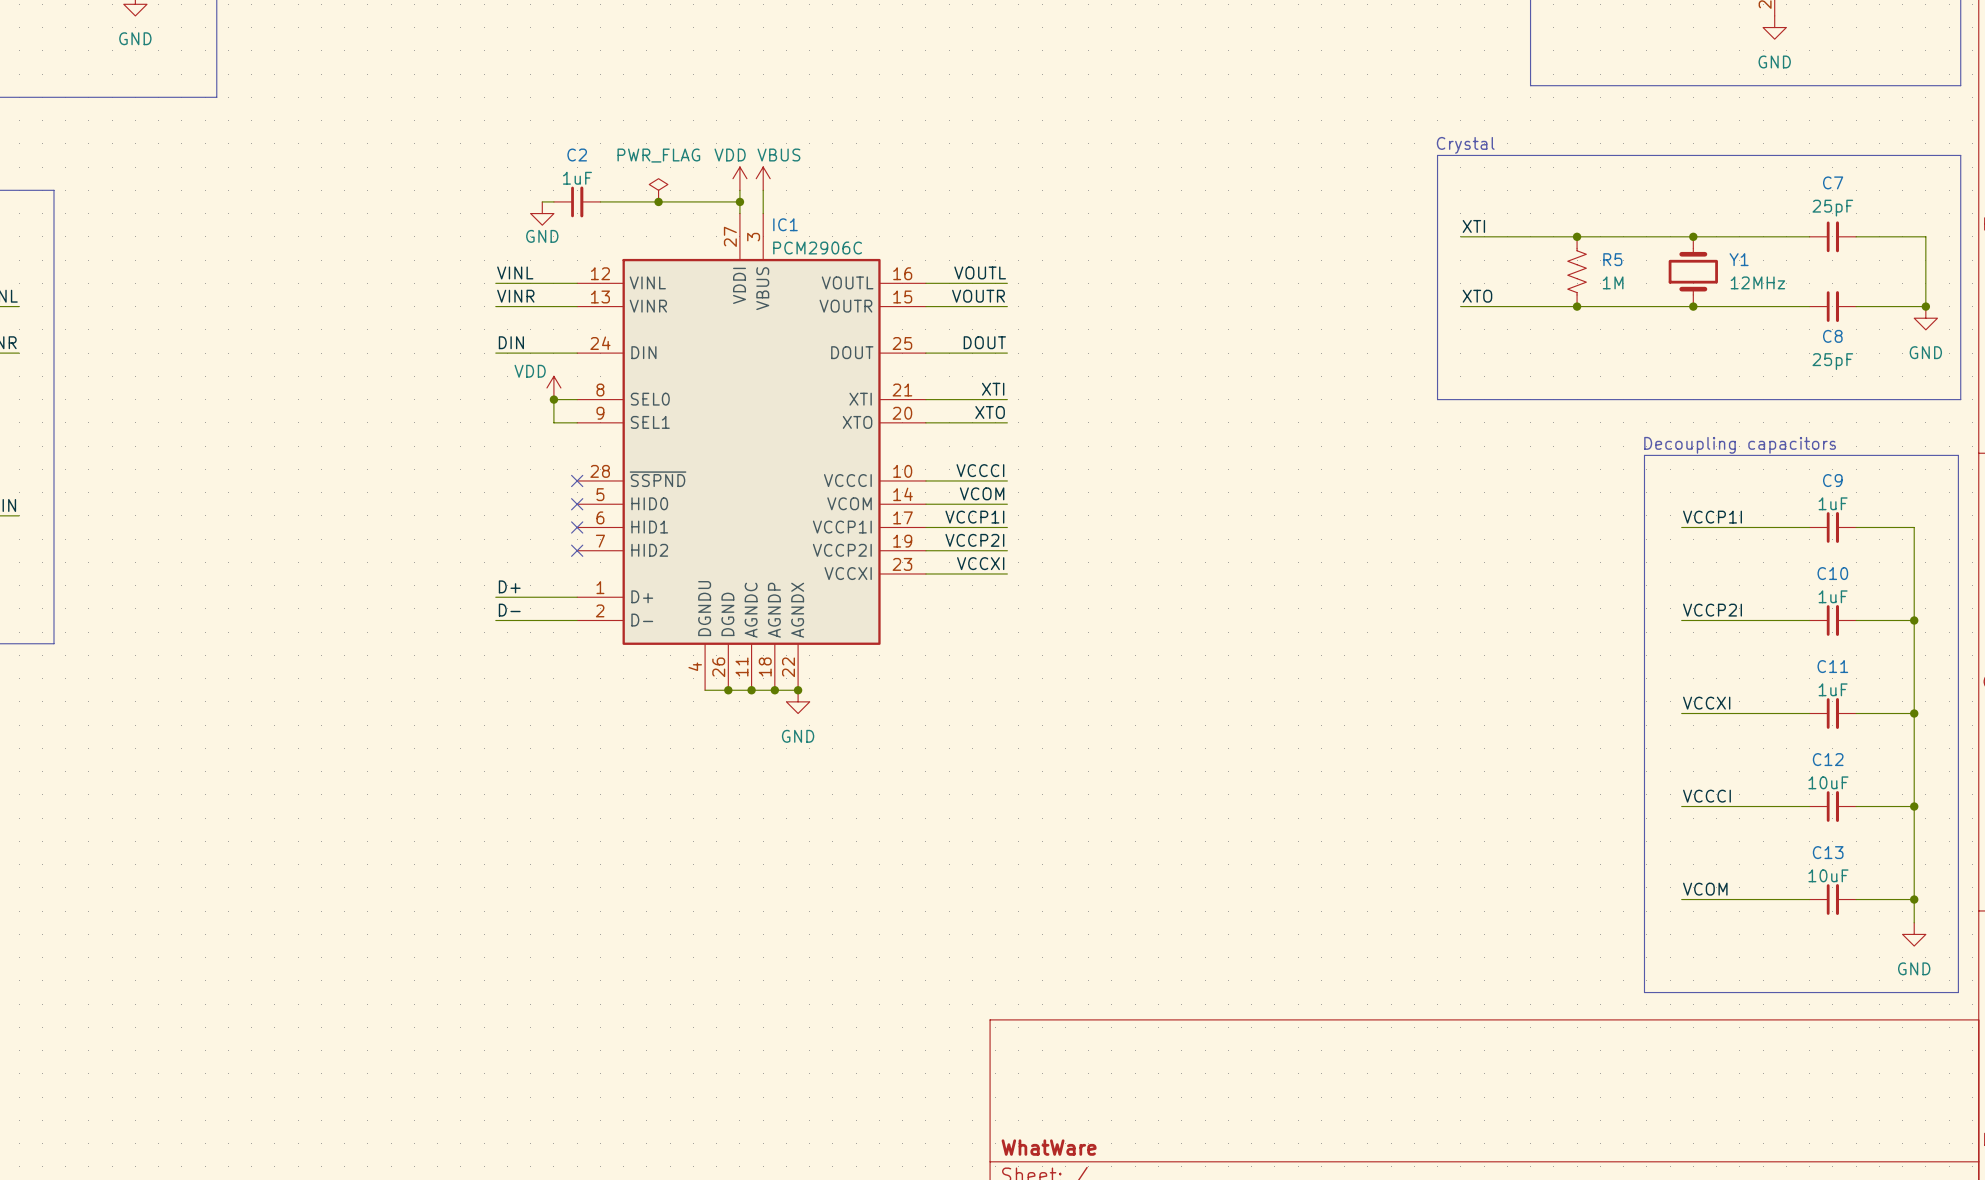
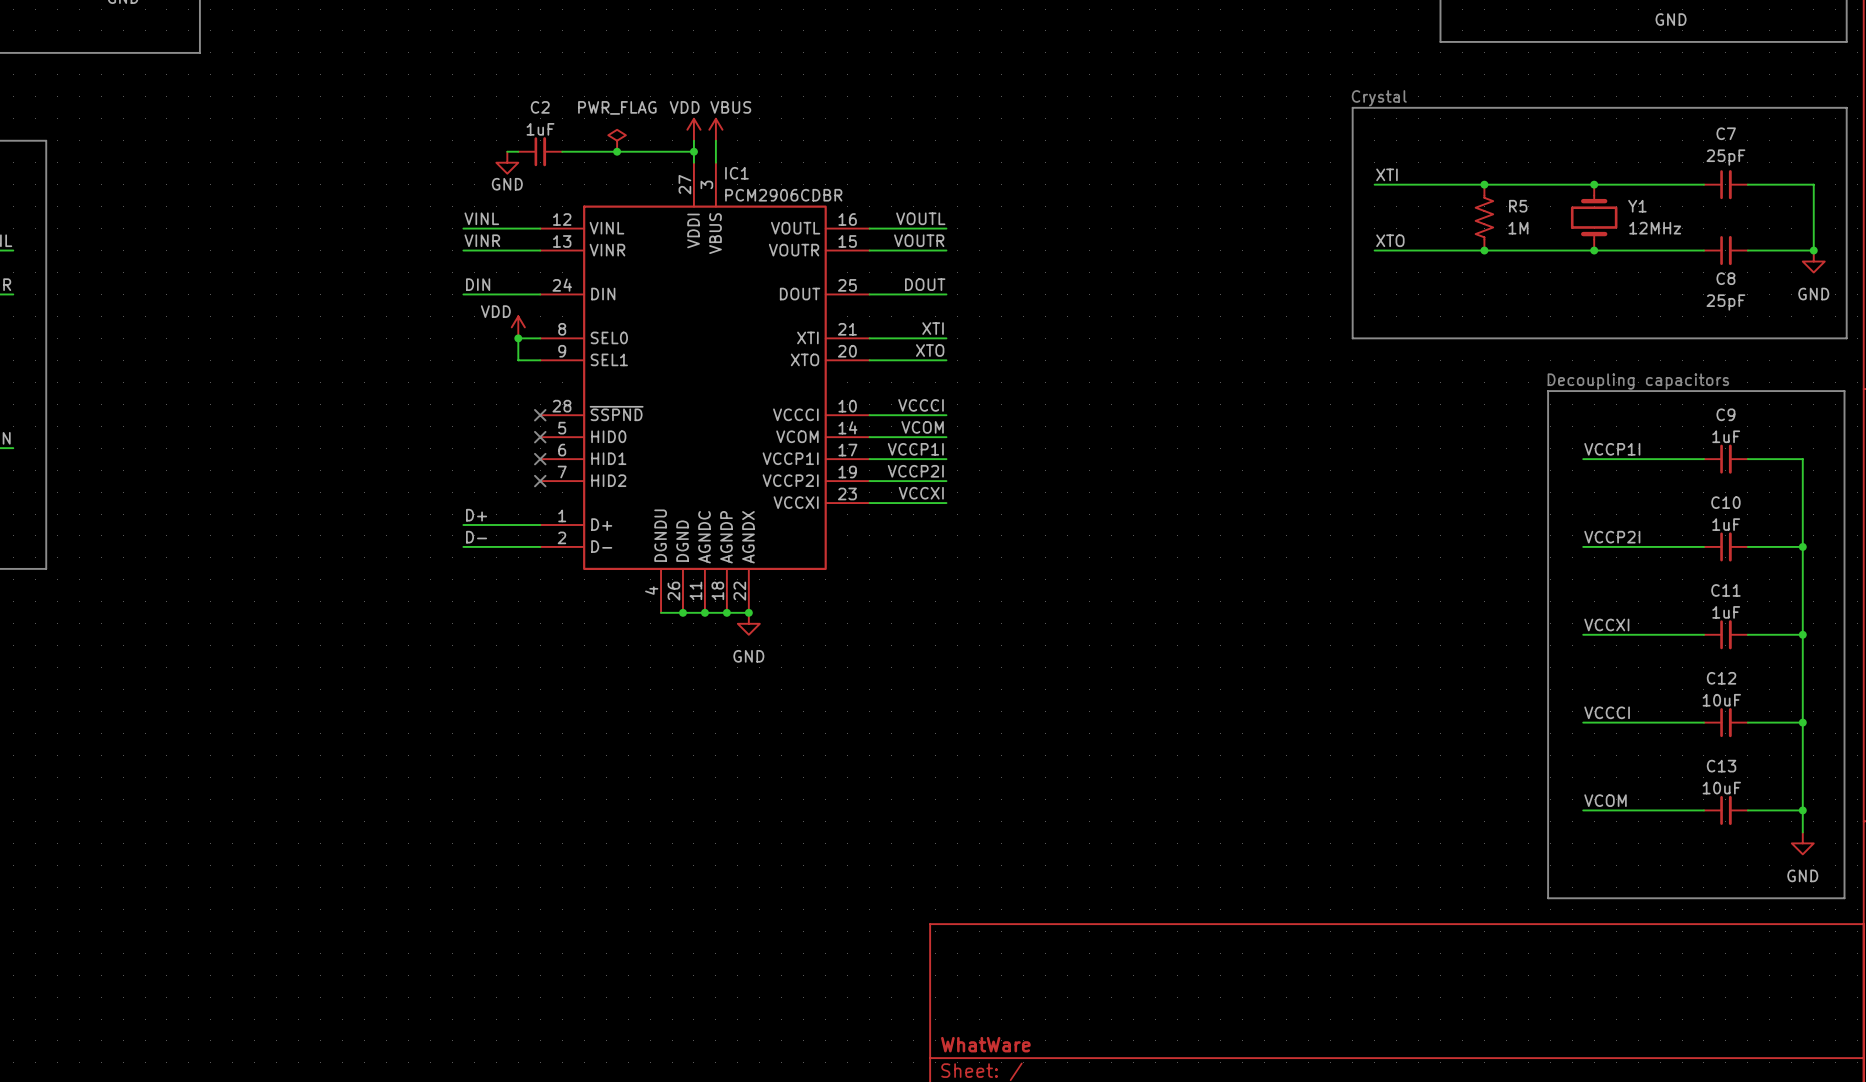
IC1 value: PCM2906C (817, 248) -> PCM2906CDBR (783, 195)

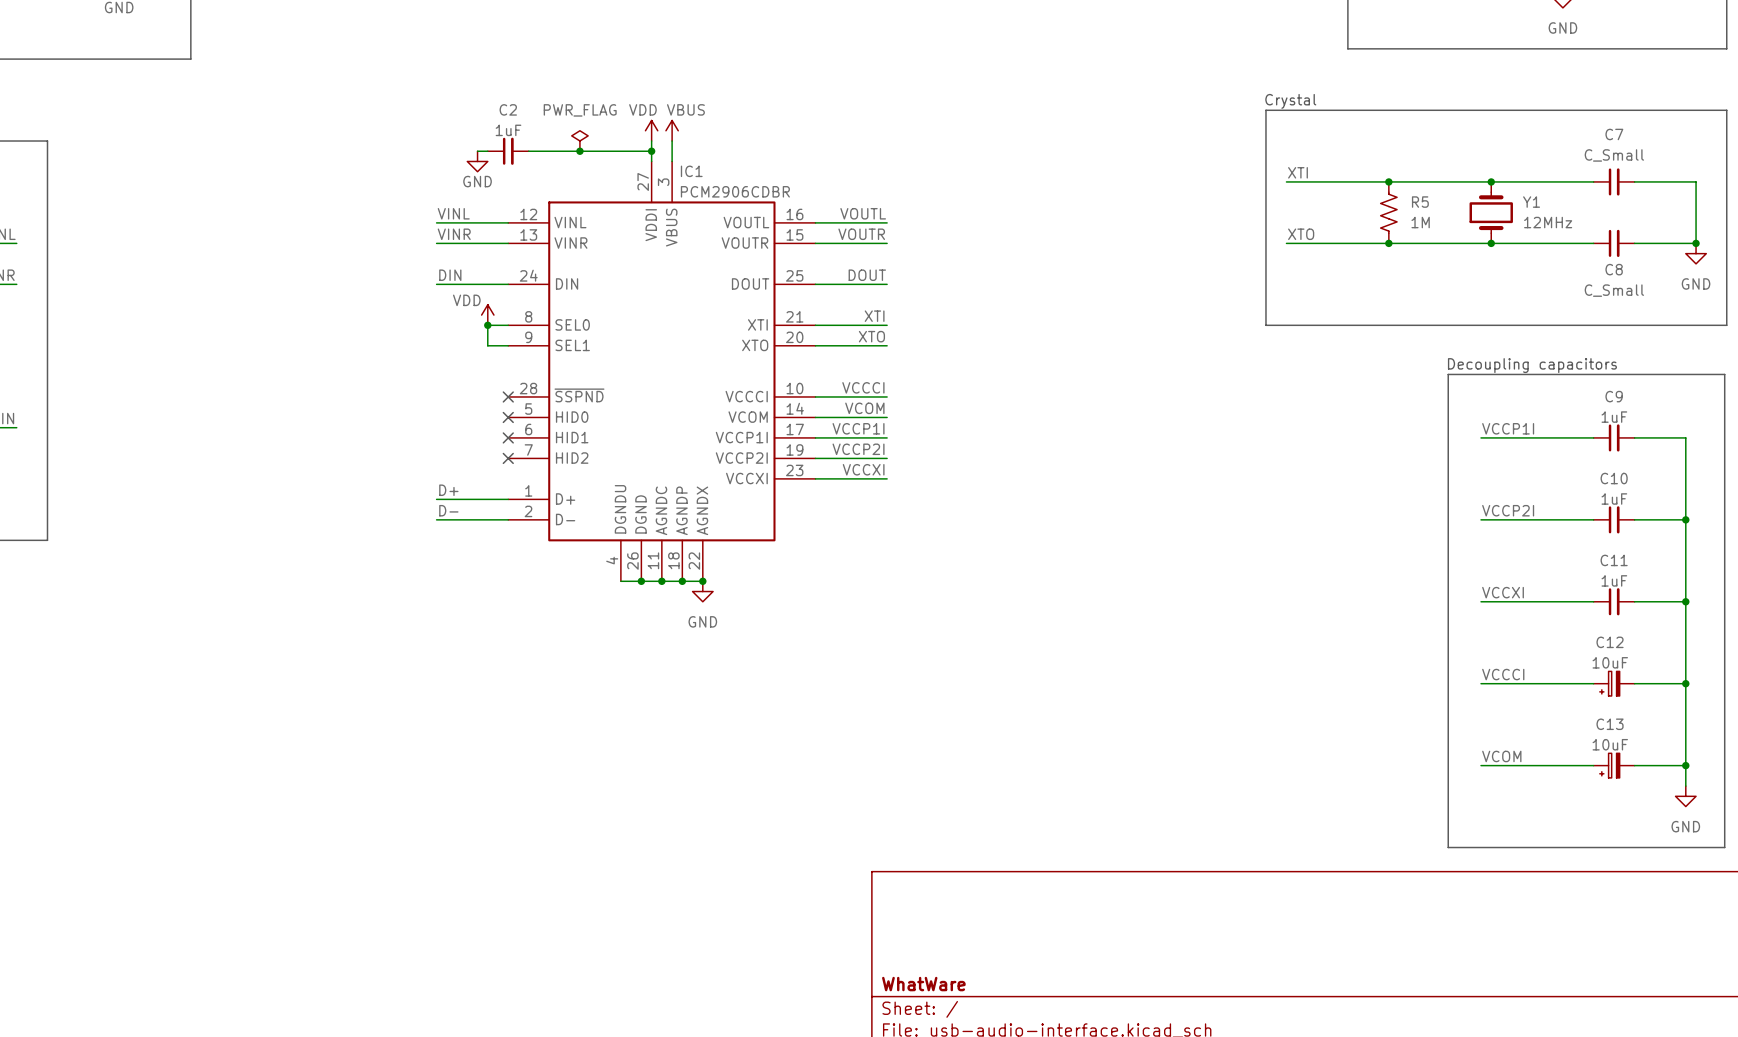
C7 value: 25pF (1725, 157) -> C_Small (1614, 155)
C8 value: 25pF (1725, 302) -> C_Small (1614, 290)
C12 symbol: [1703, 708, 1748, 738] -> [1593, 671, 1635, 696]
C13 symbol: [1703, 795, 1748, 826] -> [1593, 753, 1635, 778]

